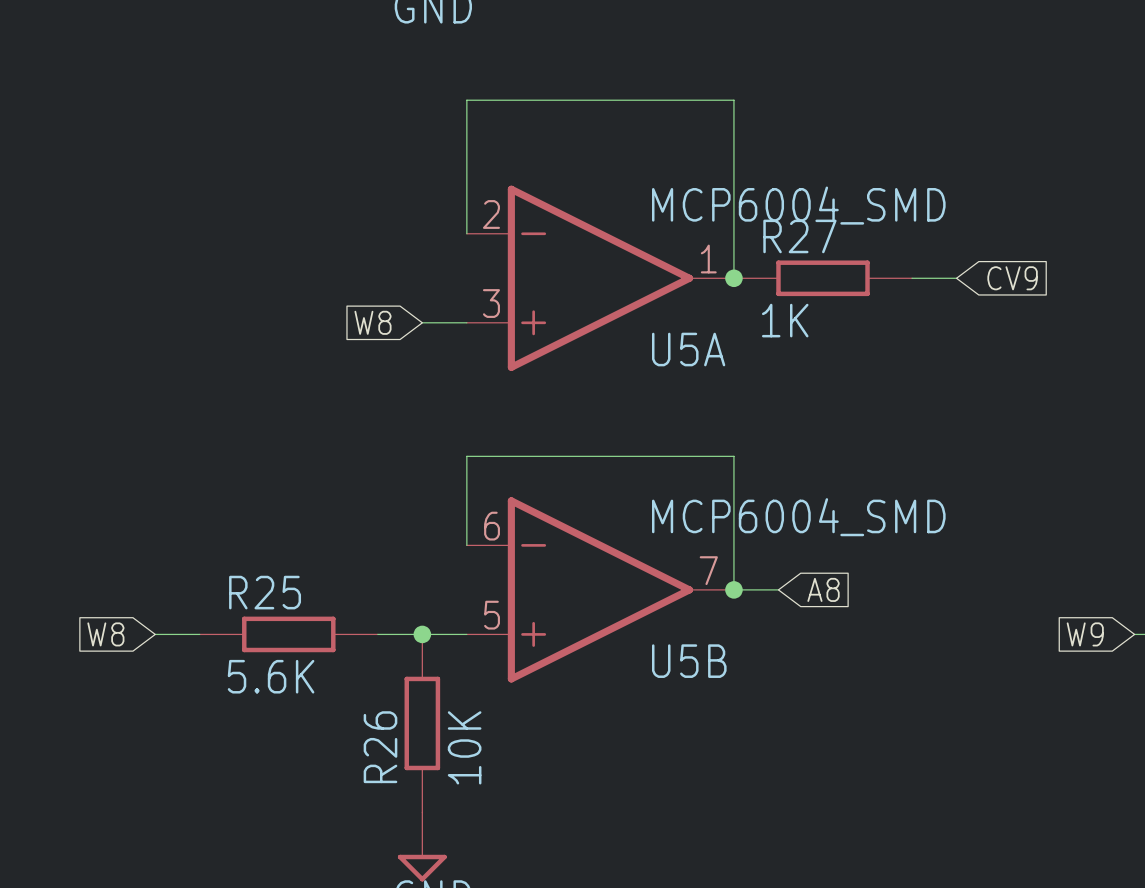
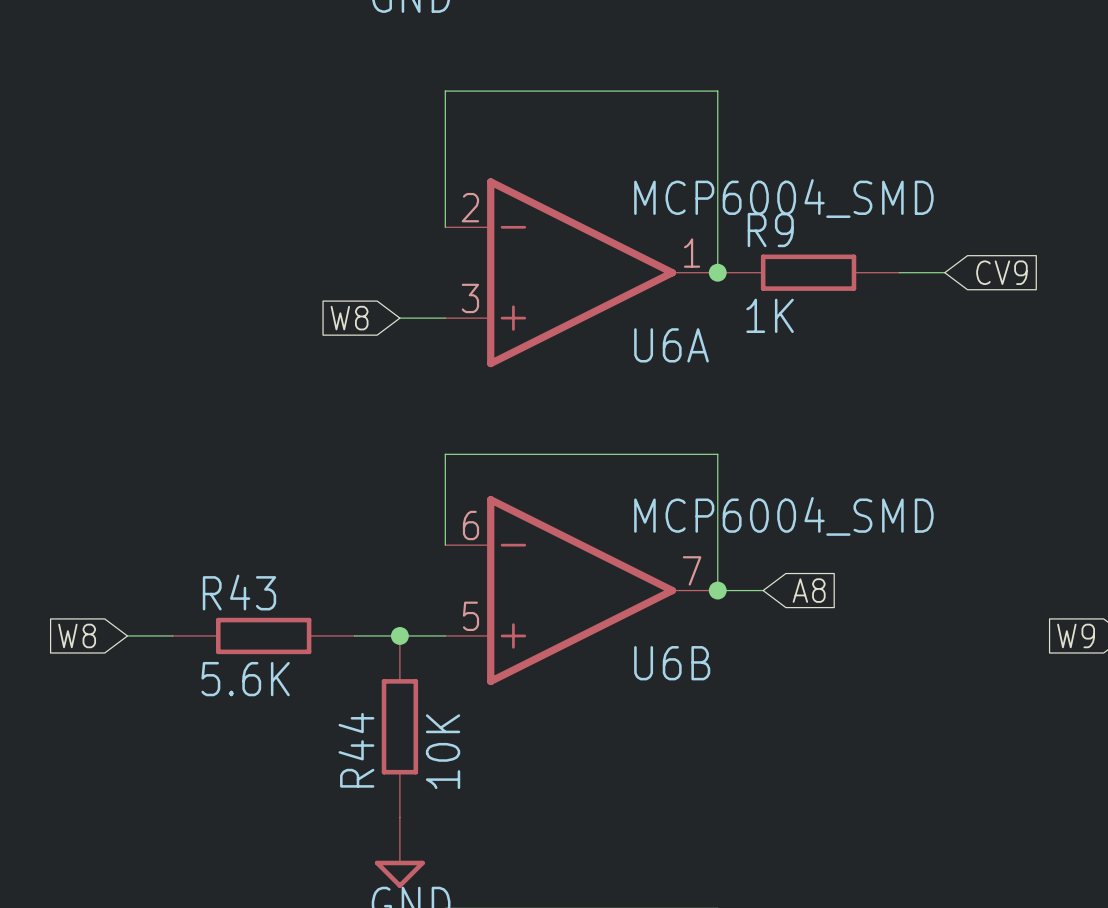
R27 name: R27 (799, 236) -> R9 (770, 230)
U5A name: U5A (688, 349) -> U6A (671, 345)
R25 name: R25 (265, 592) -> R43 (239, 592)
U5B name: U5B (689, 661) -> U6B (672, 663)
R26 name: R26 (380, 747) -> R44 (356, 750)

